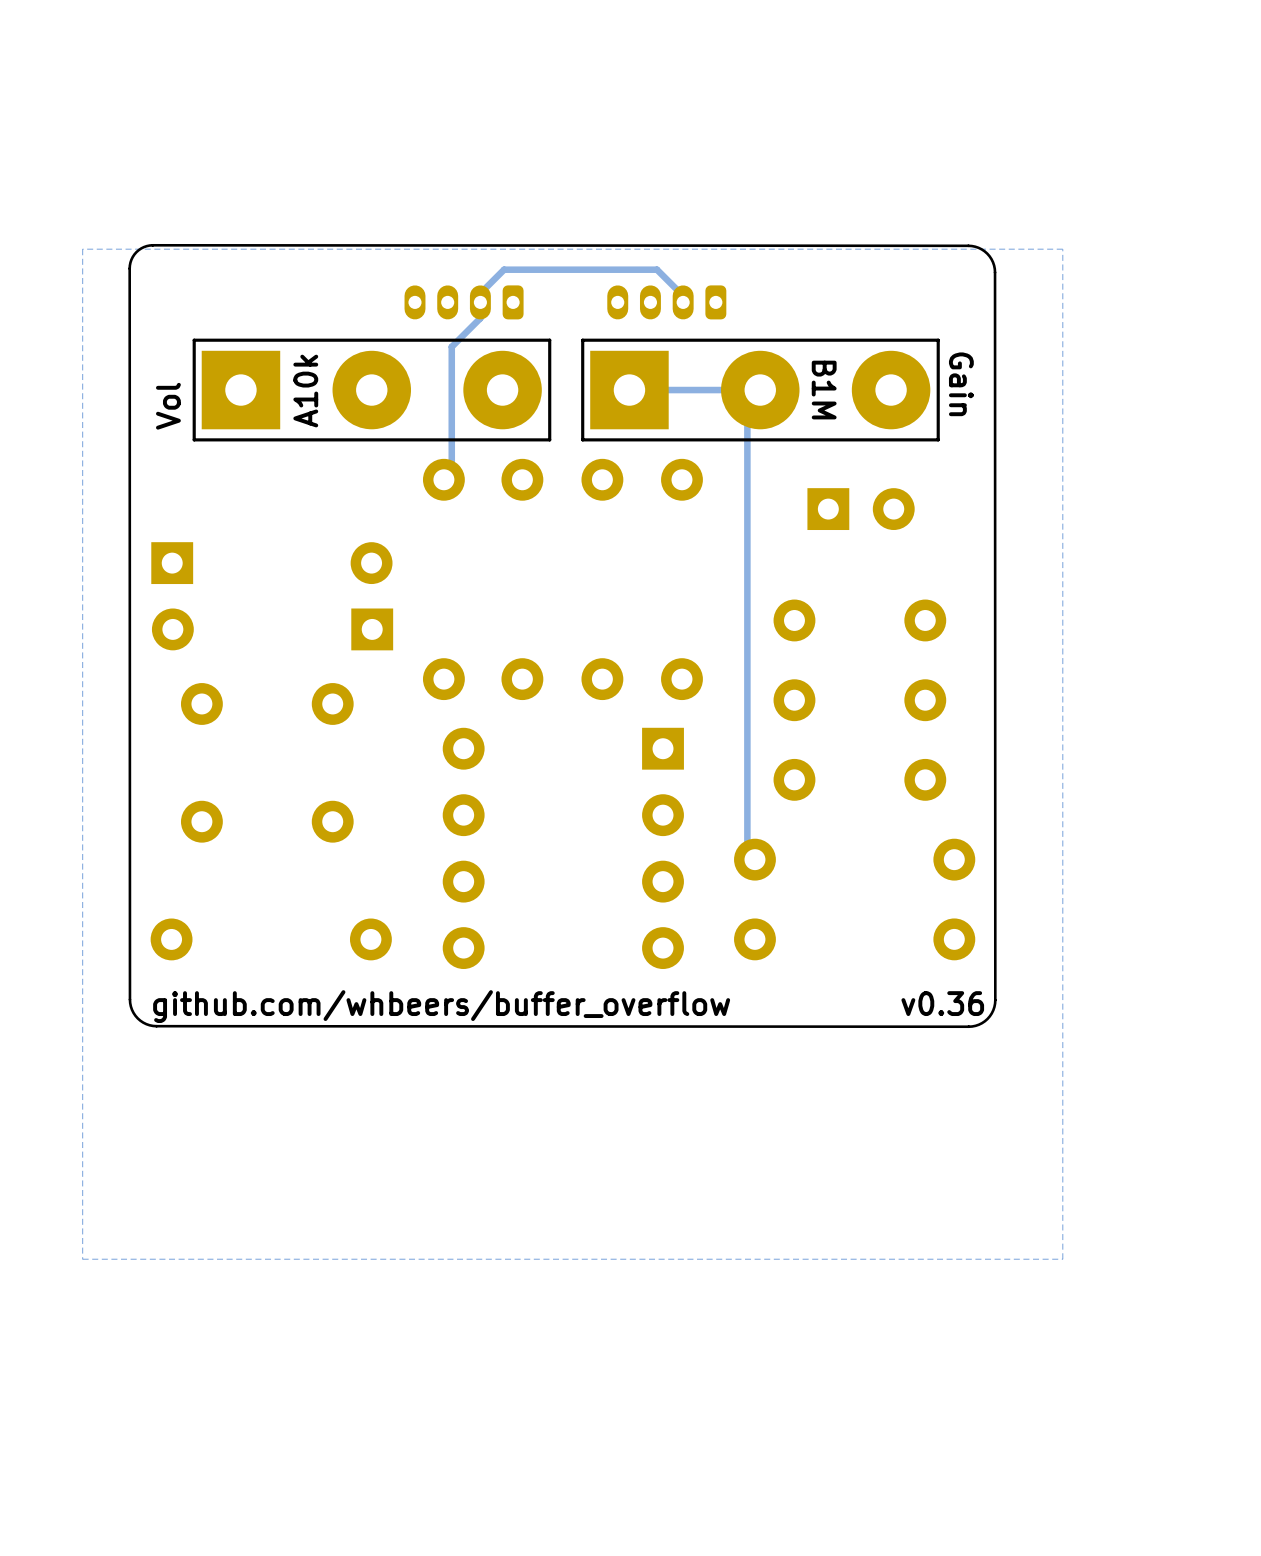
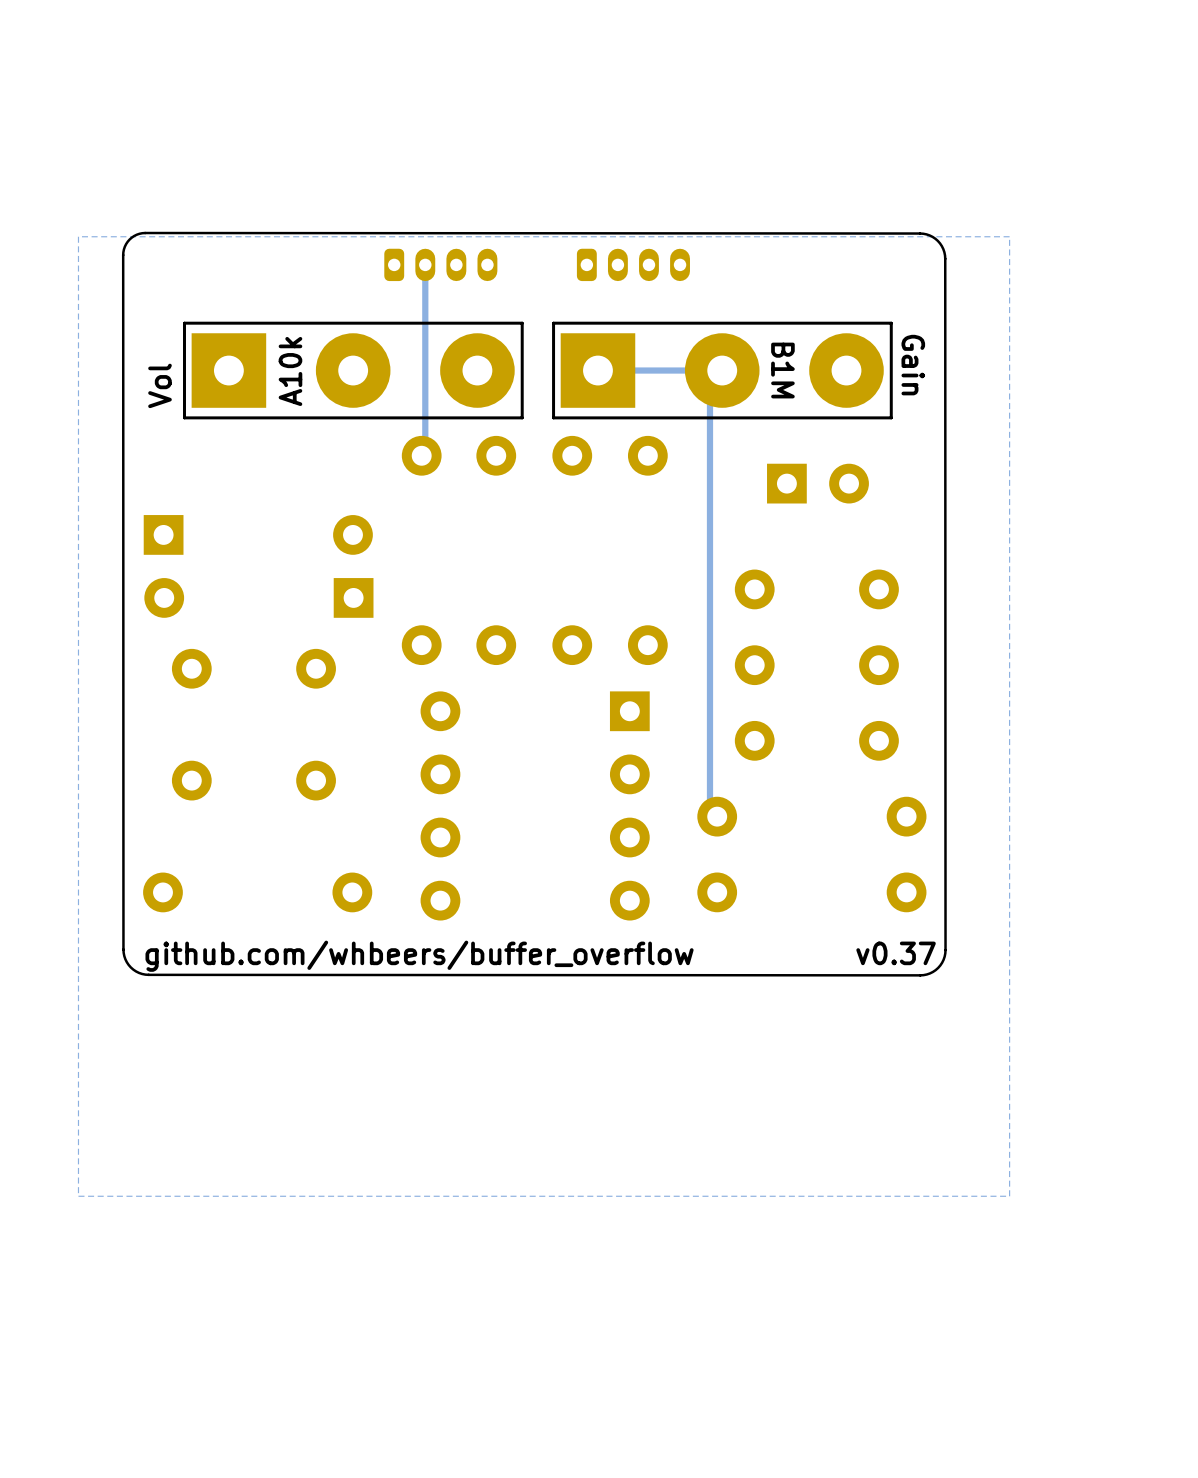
part rotation: 0° (464, 302) -> 180° (440, 264)
part rotation: 0° (666, 302) -> 180° (633, 264)
track: (683, 302) (683, 295) (656, 269) (504, 269) (480, 293) (480, 318) (451, 346) (451, 471) (447, 475) -> (425, 264) (425, 452)
text: v0.36 (942, 1003) -> v0.37 (896, 953)

